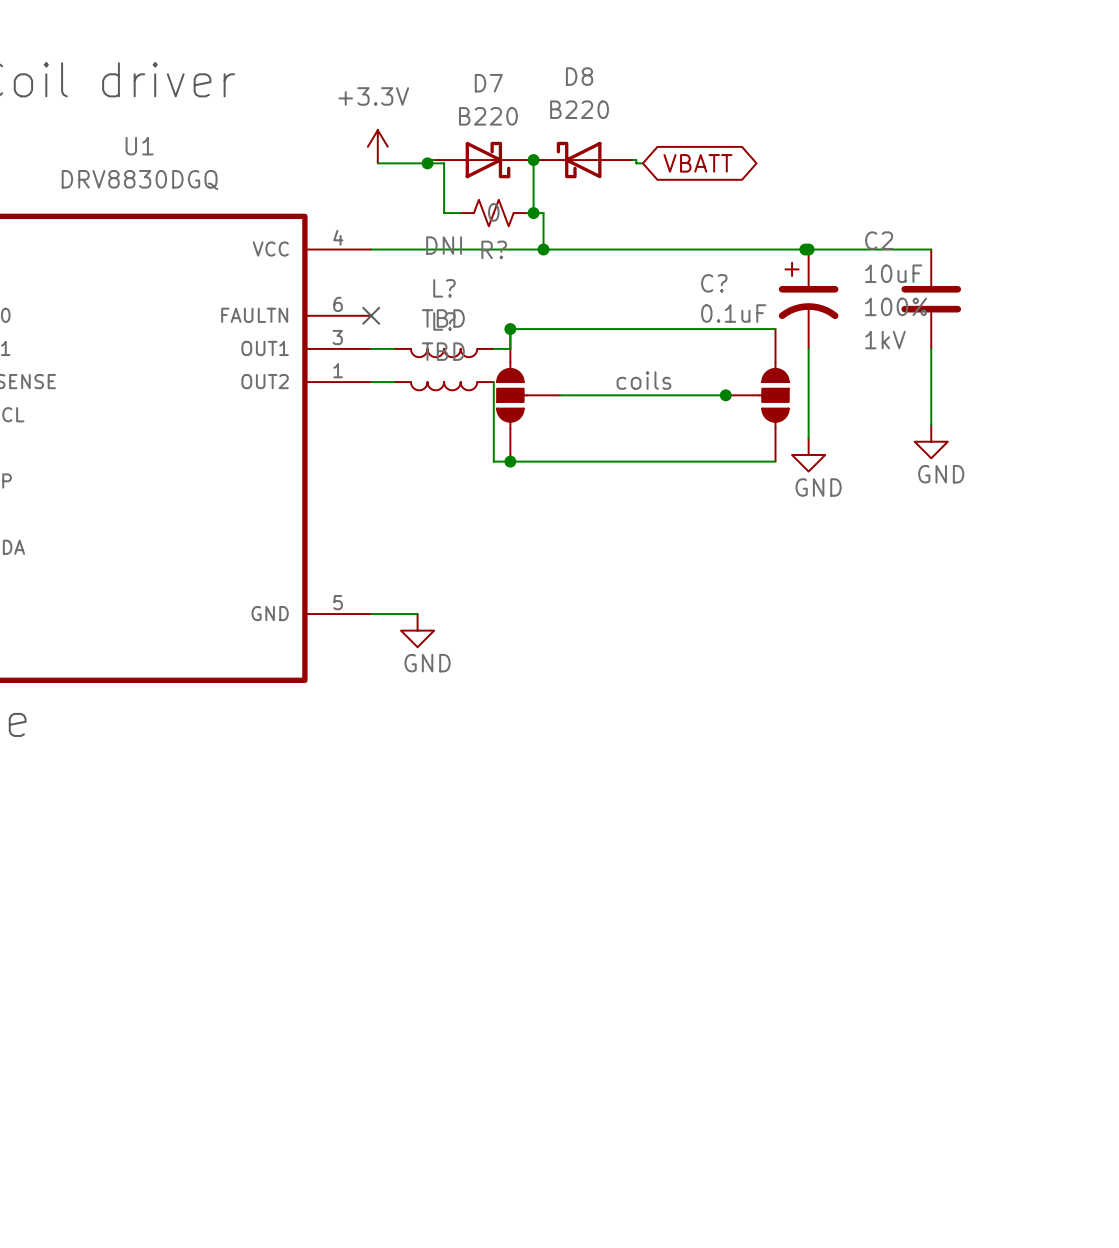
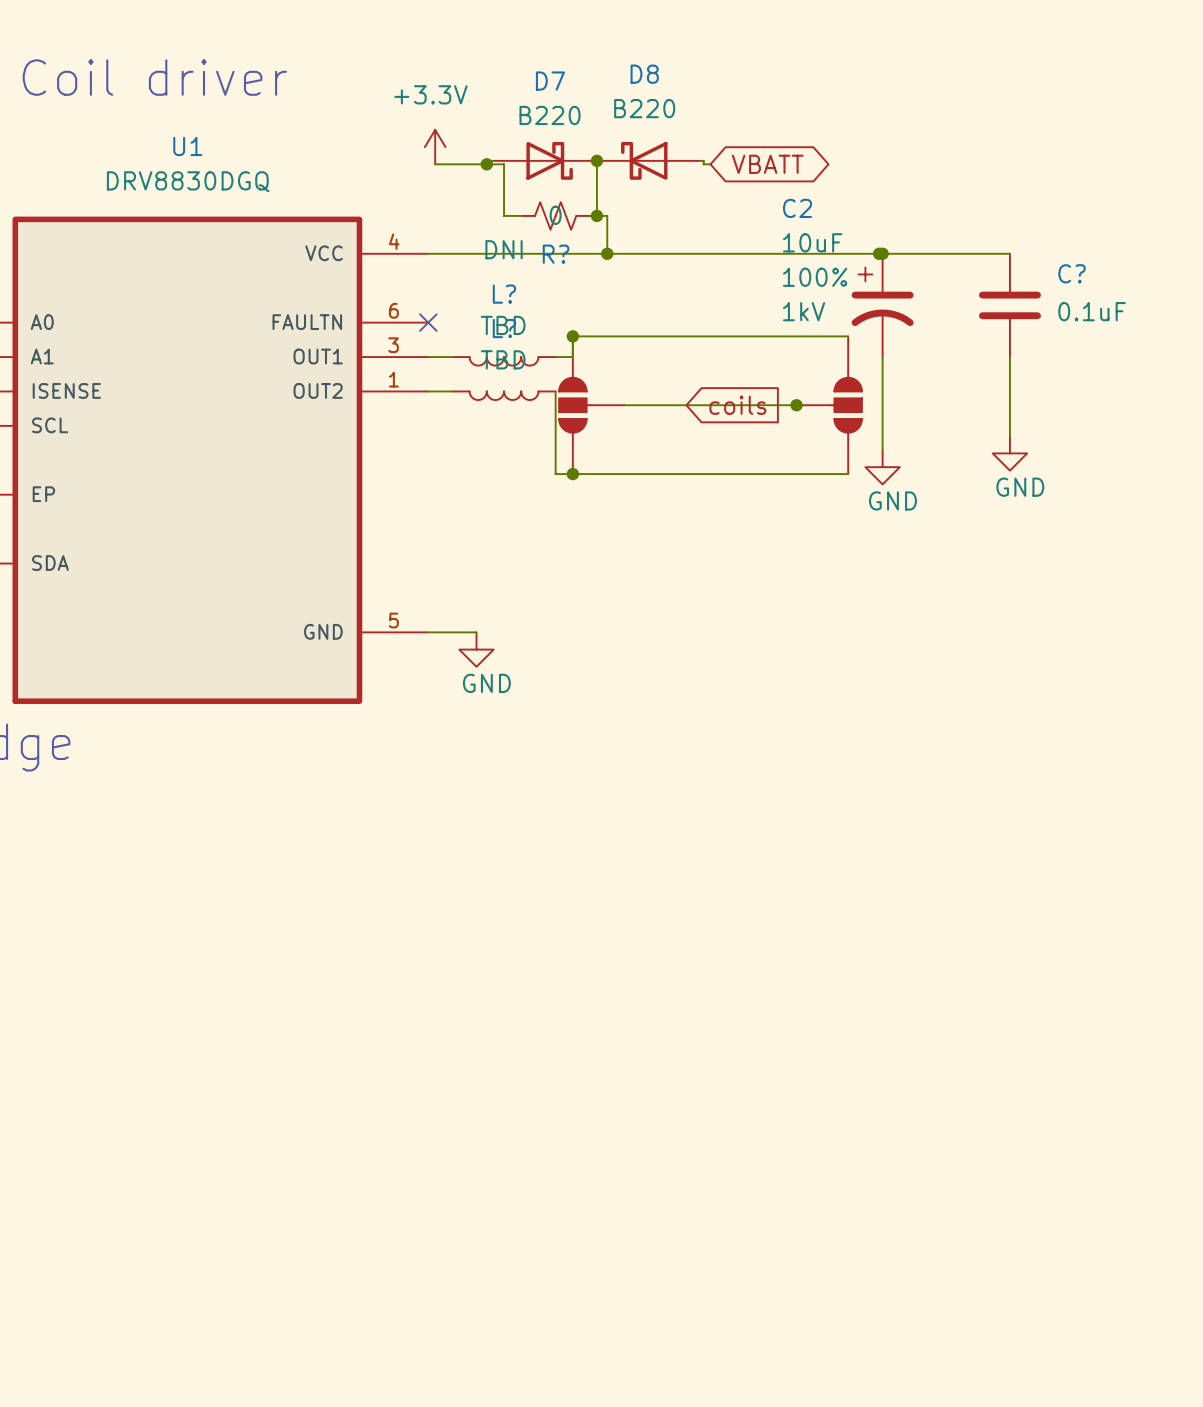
C2 name position: C2 (879, 240) -> C2 (797, 208)
C2 value position: 10uF (893, 273) -> 10uF (812, 242)
C? name position: C? (714, 283) -> C? (1072, 273)
C2 text position: 100% (896, 306) -> 100% (815, 277)
C? value position: 0.1uF (733, 313) -> 0.1uF (1092, 311)
C2 text position: 1kV (885, 340) -> 1kV (804, 311)
label: coils (644, 380) -> none
global label: none -> coils (737, 405)

